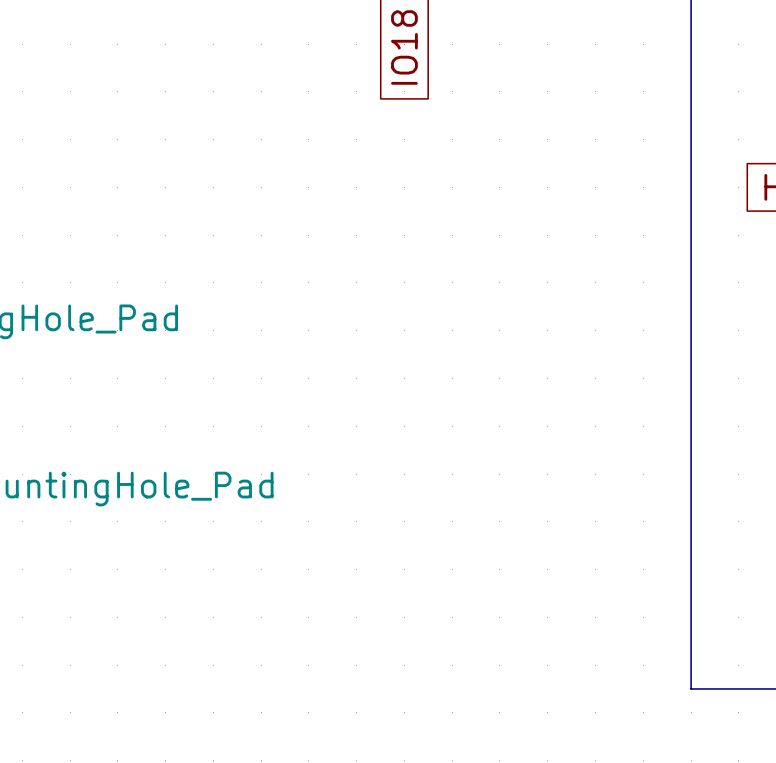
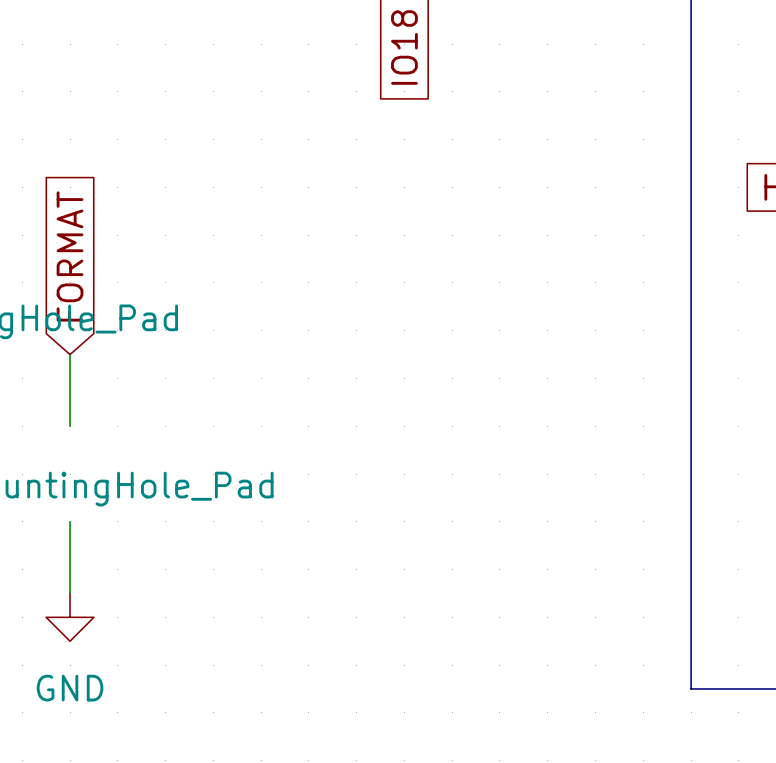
global label: none -> FORMAT (70, 256)
wire: none -> (70, 354) (70, 426)
wire: none -> (70, 521) (70, 593)
power symbol: none -> GND (70, 617)

